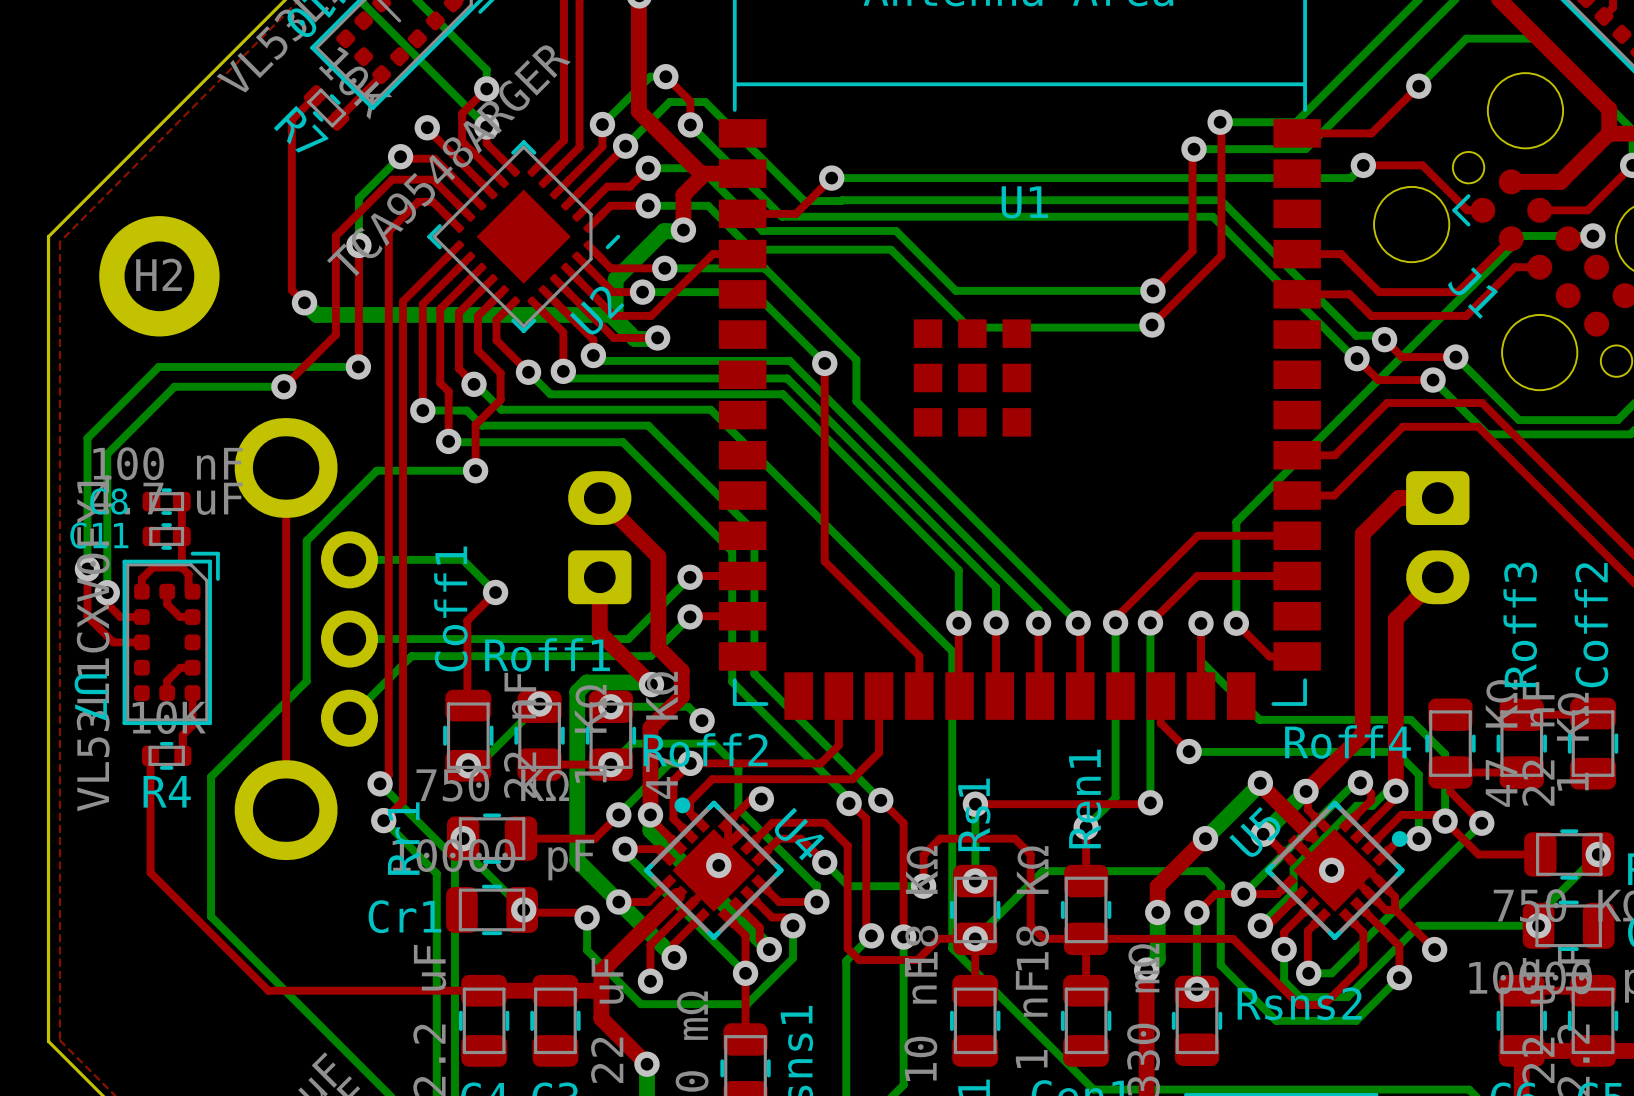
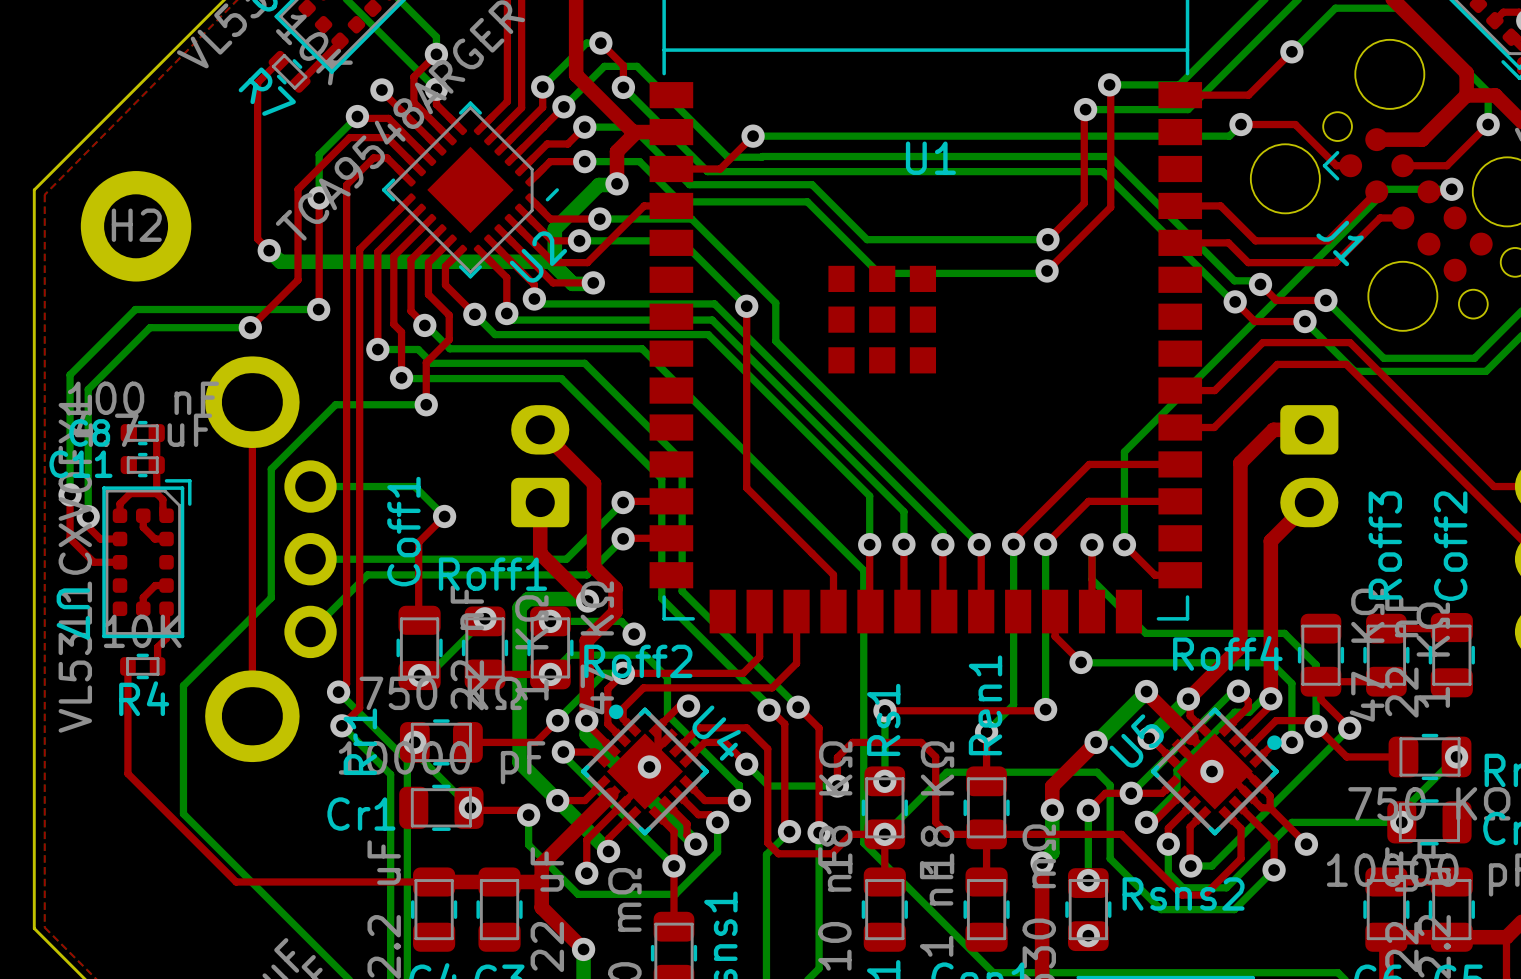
via: none -> (1088, 935)

